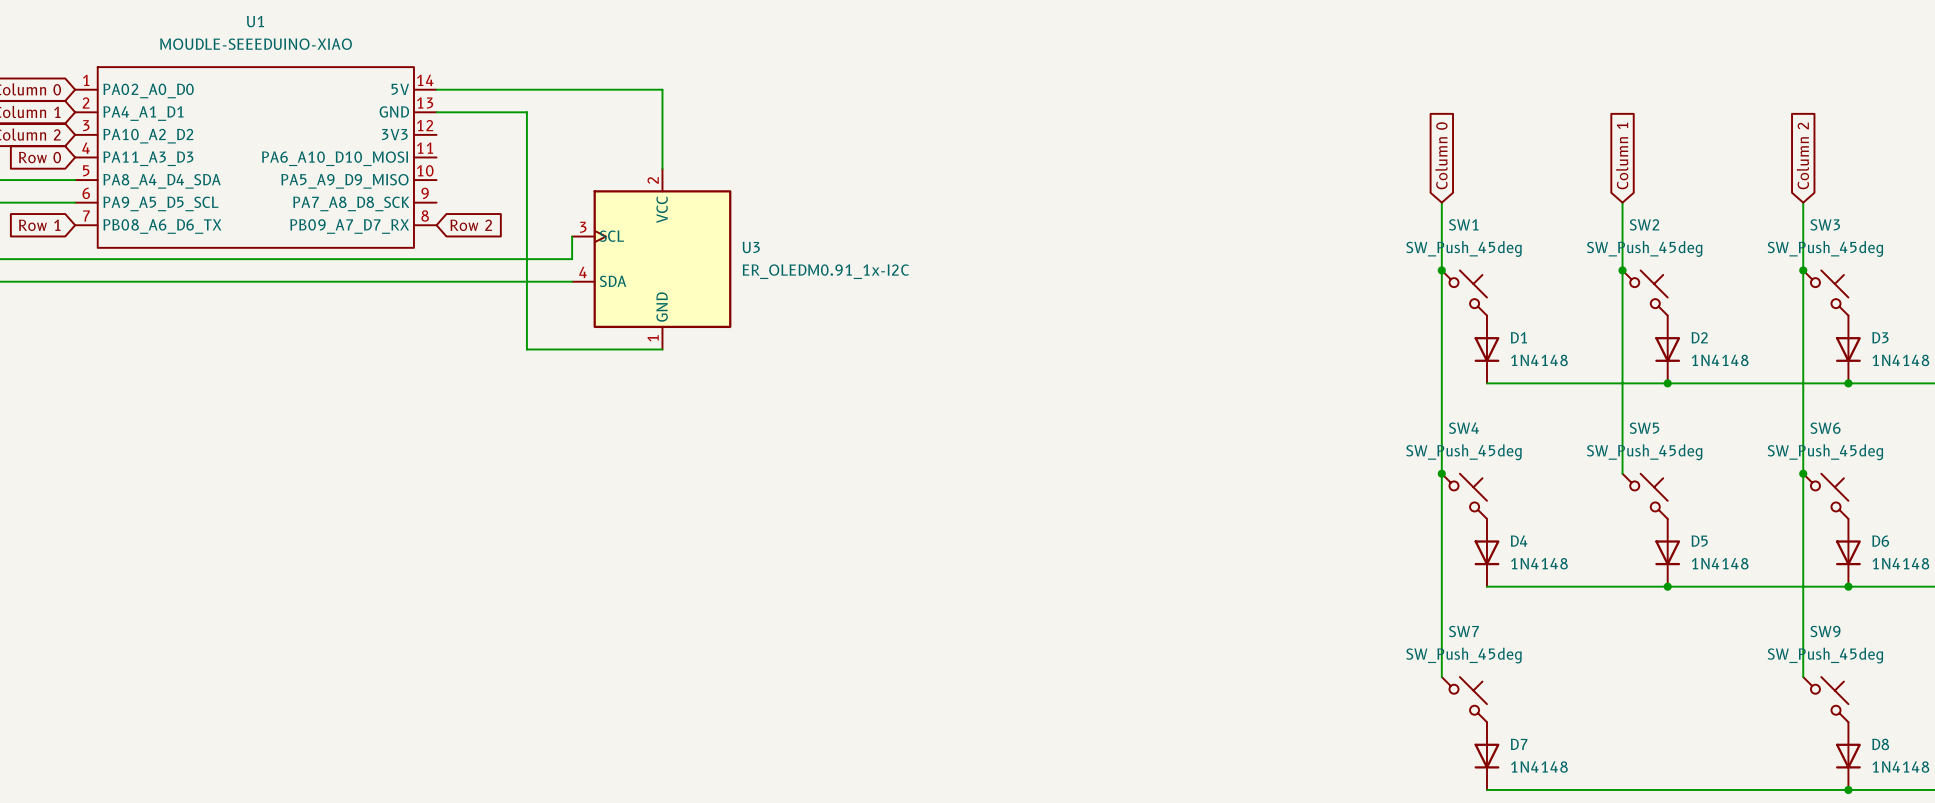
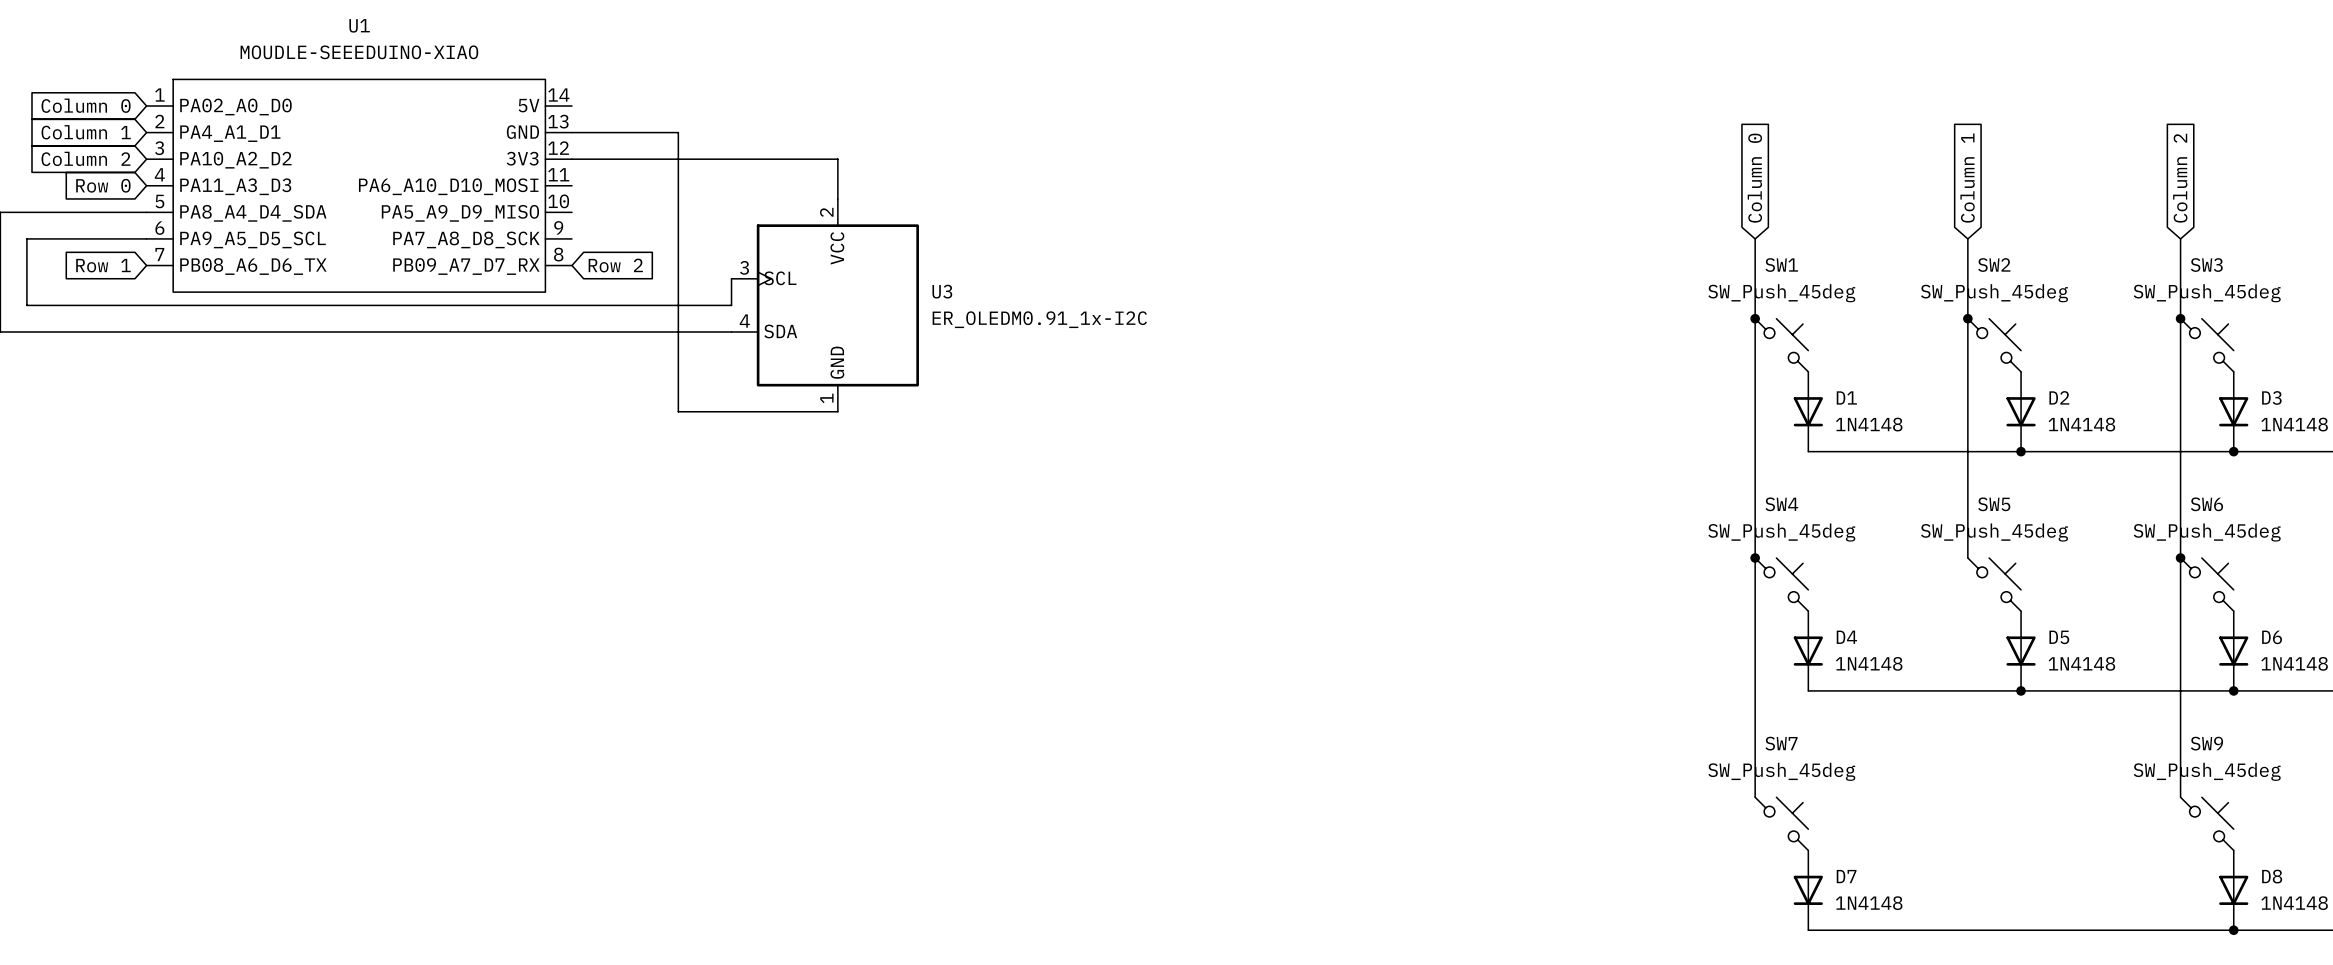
wire: (436, 89) (662, 89) (662, 134) -> (571, 159) (837, 159)

